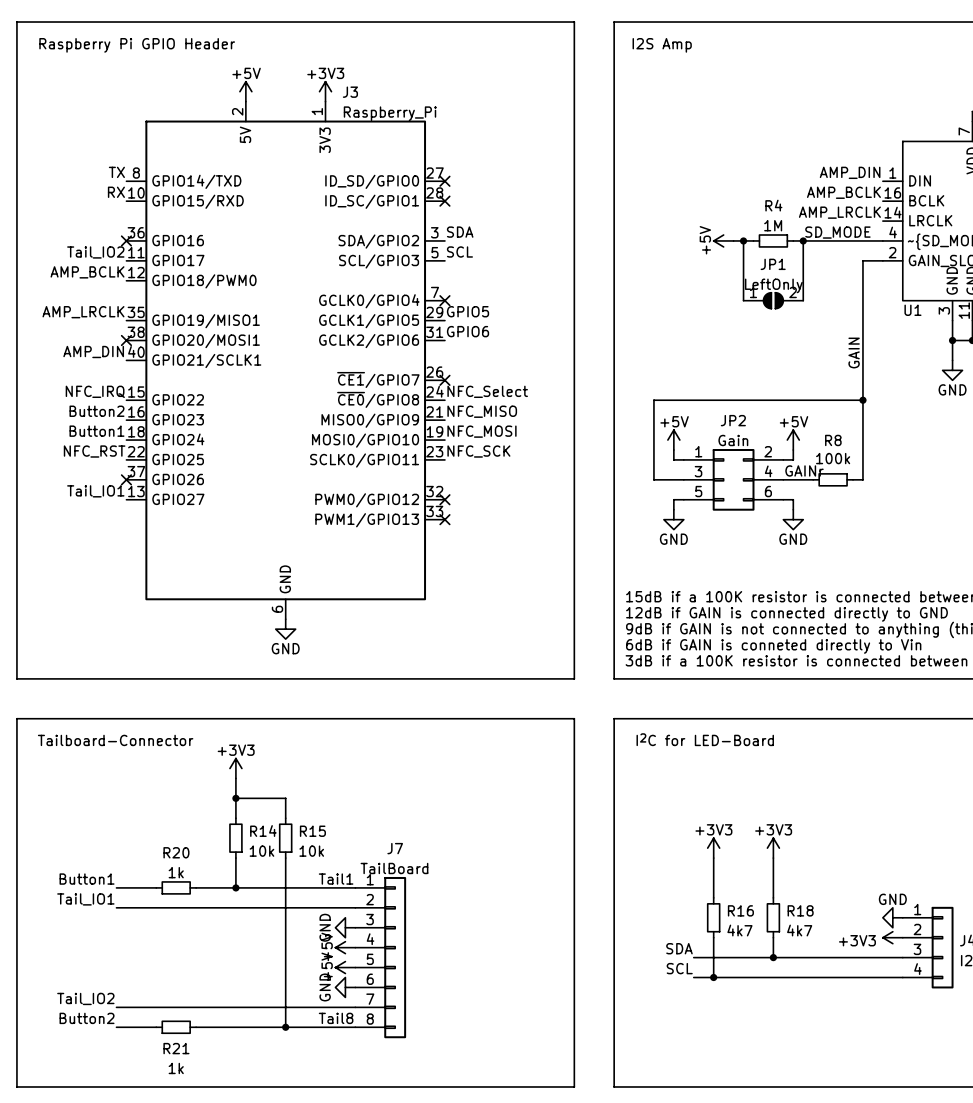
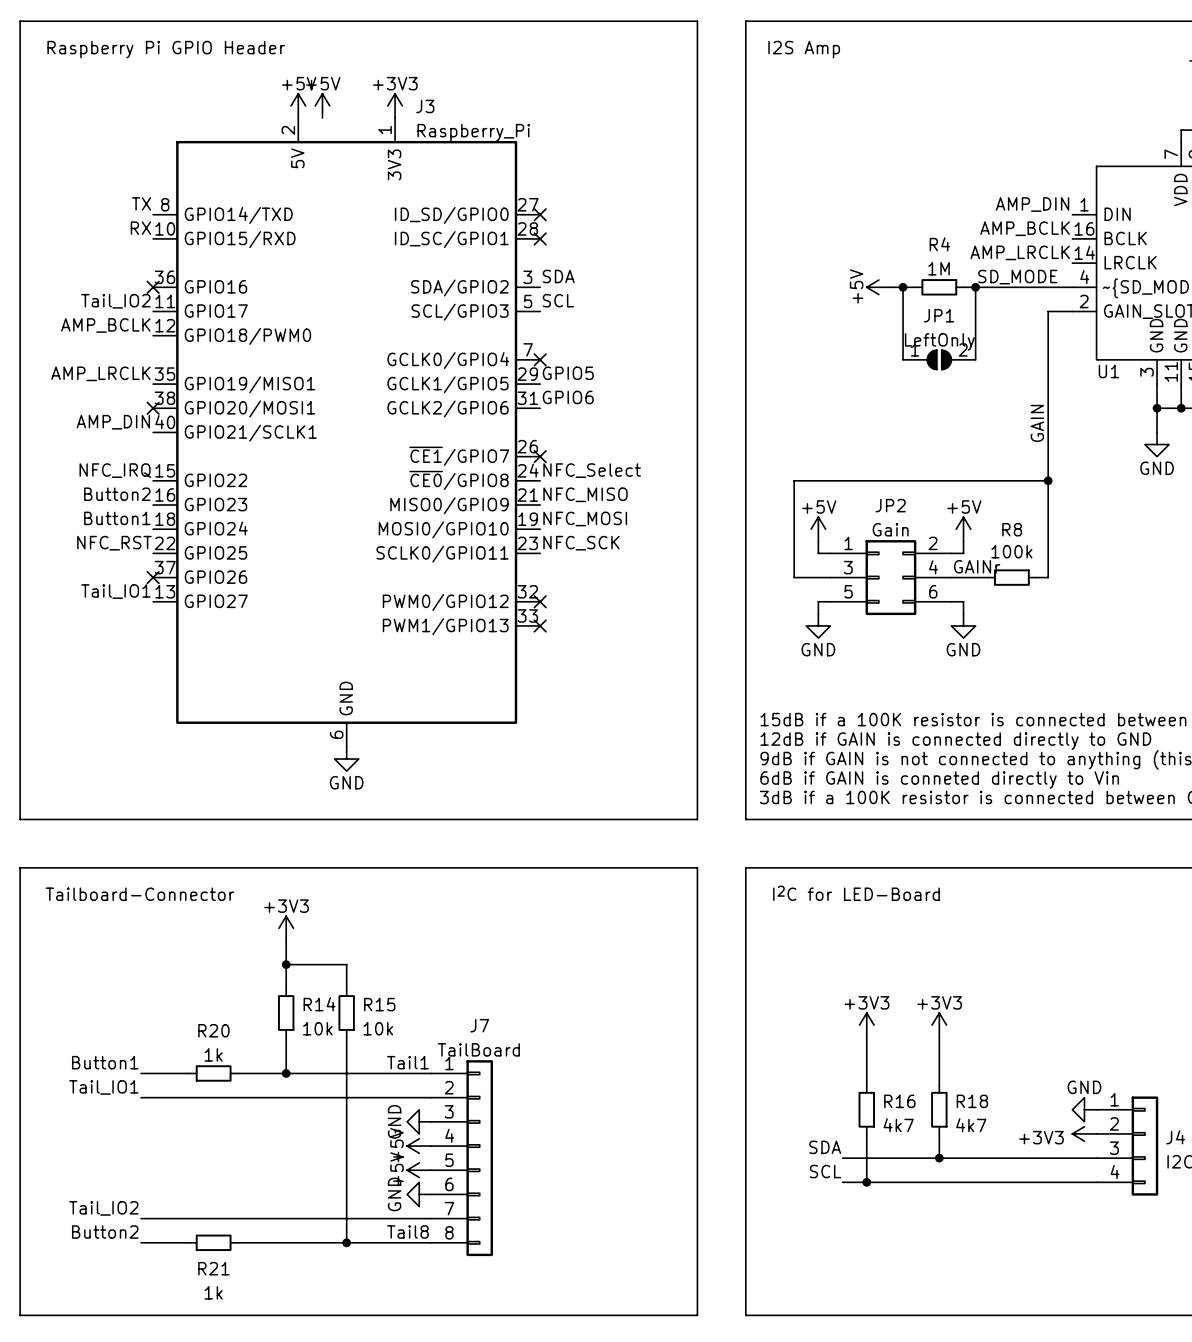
power symbol: none -> +5V (322, 105)

